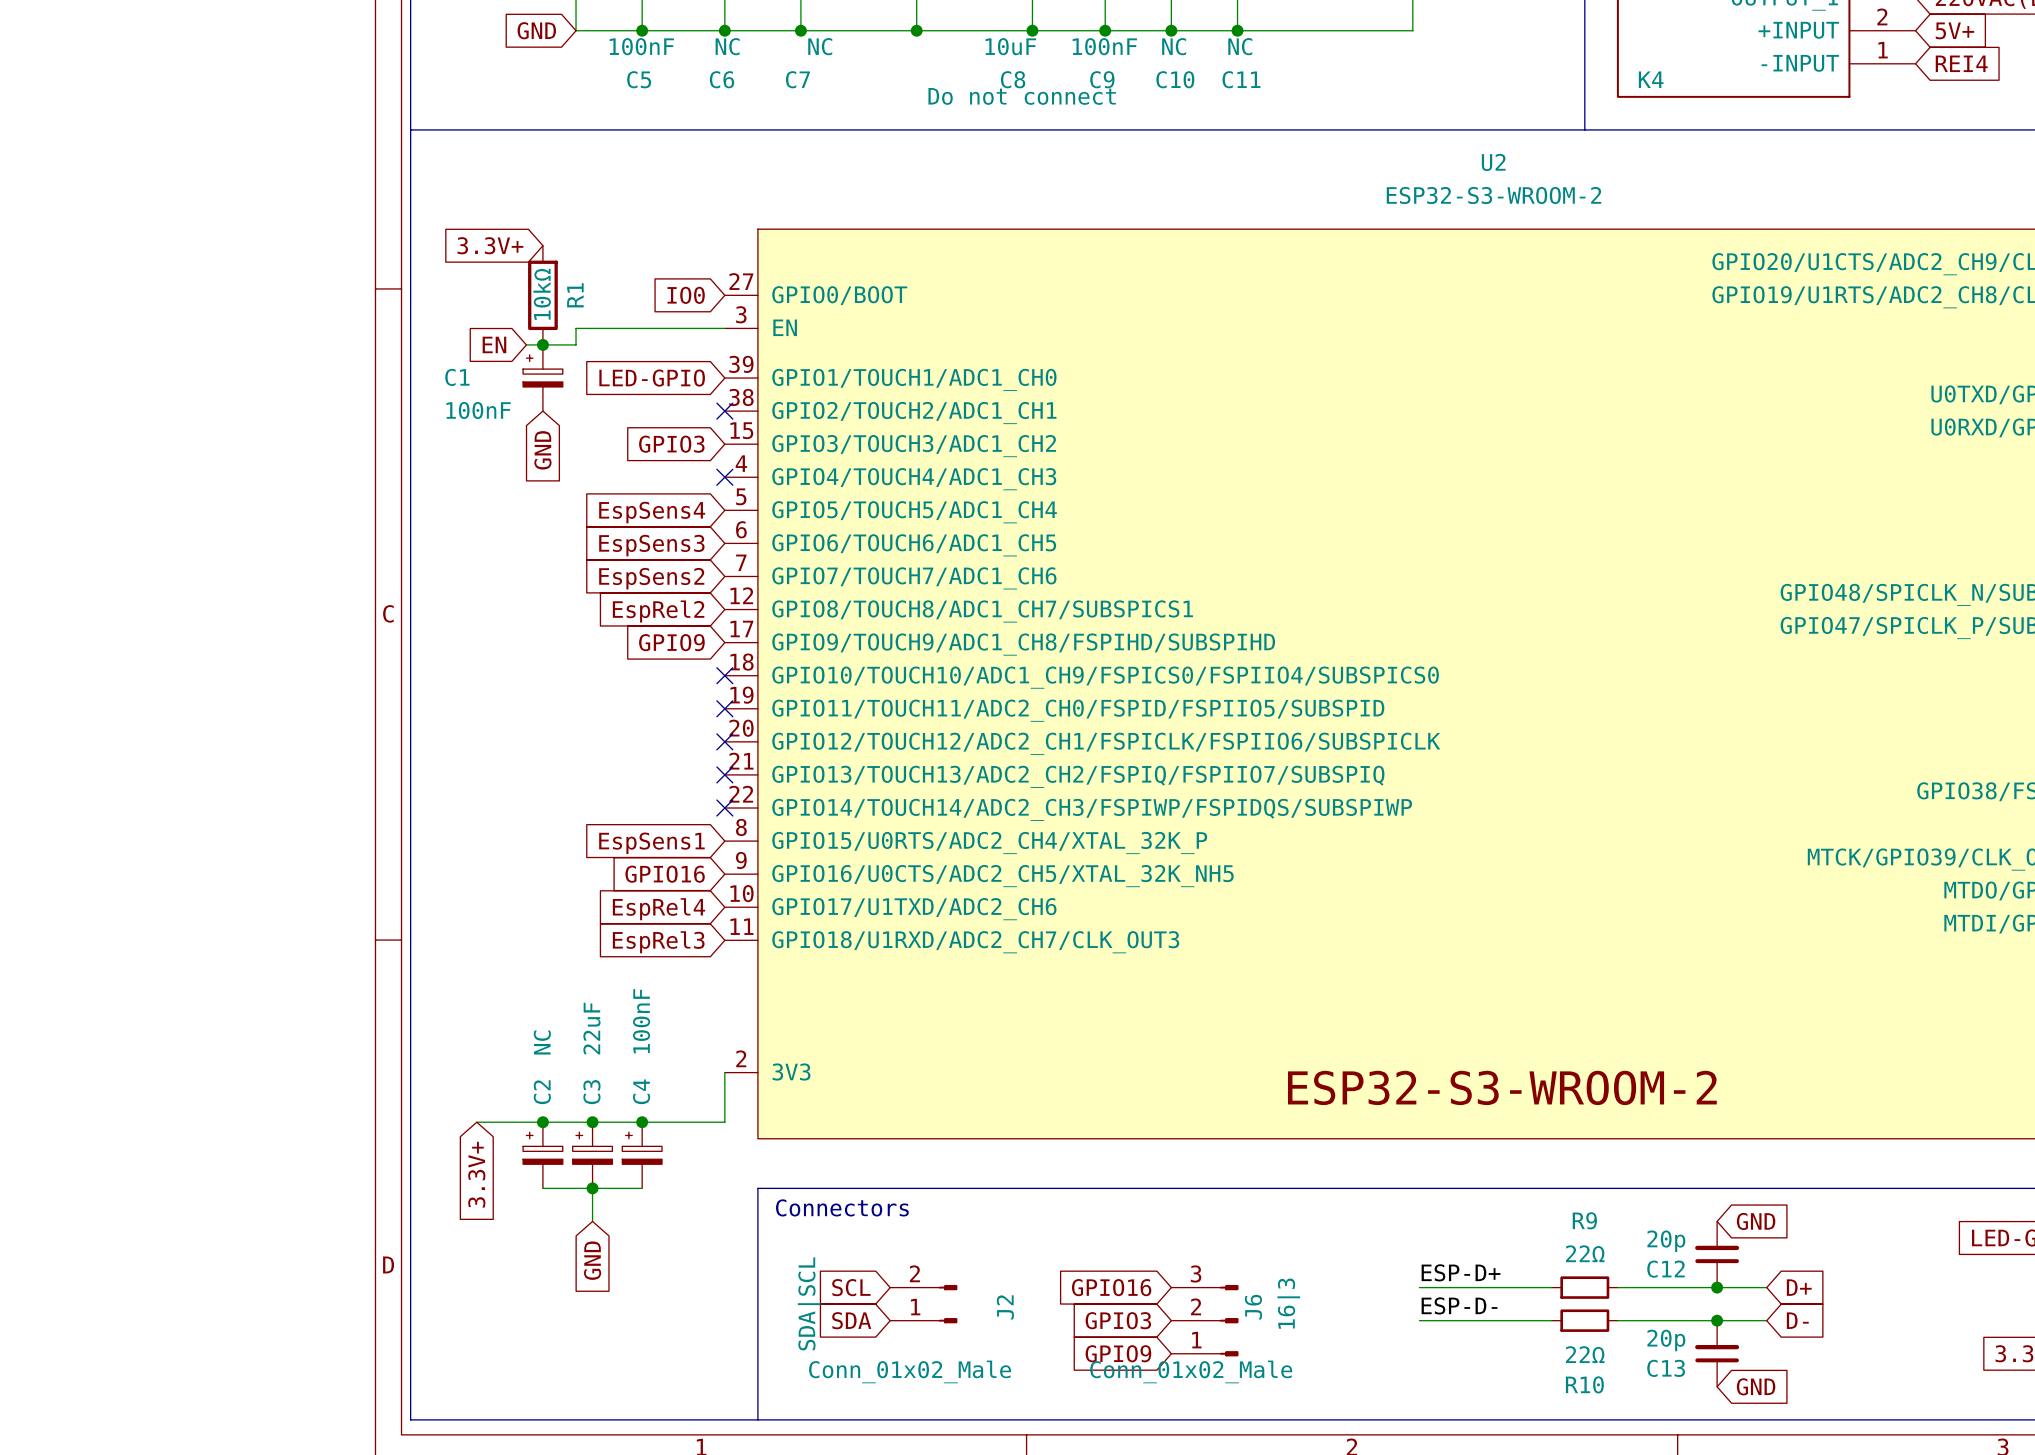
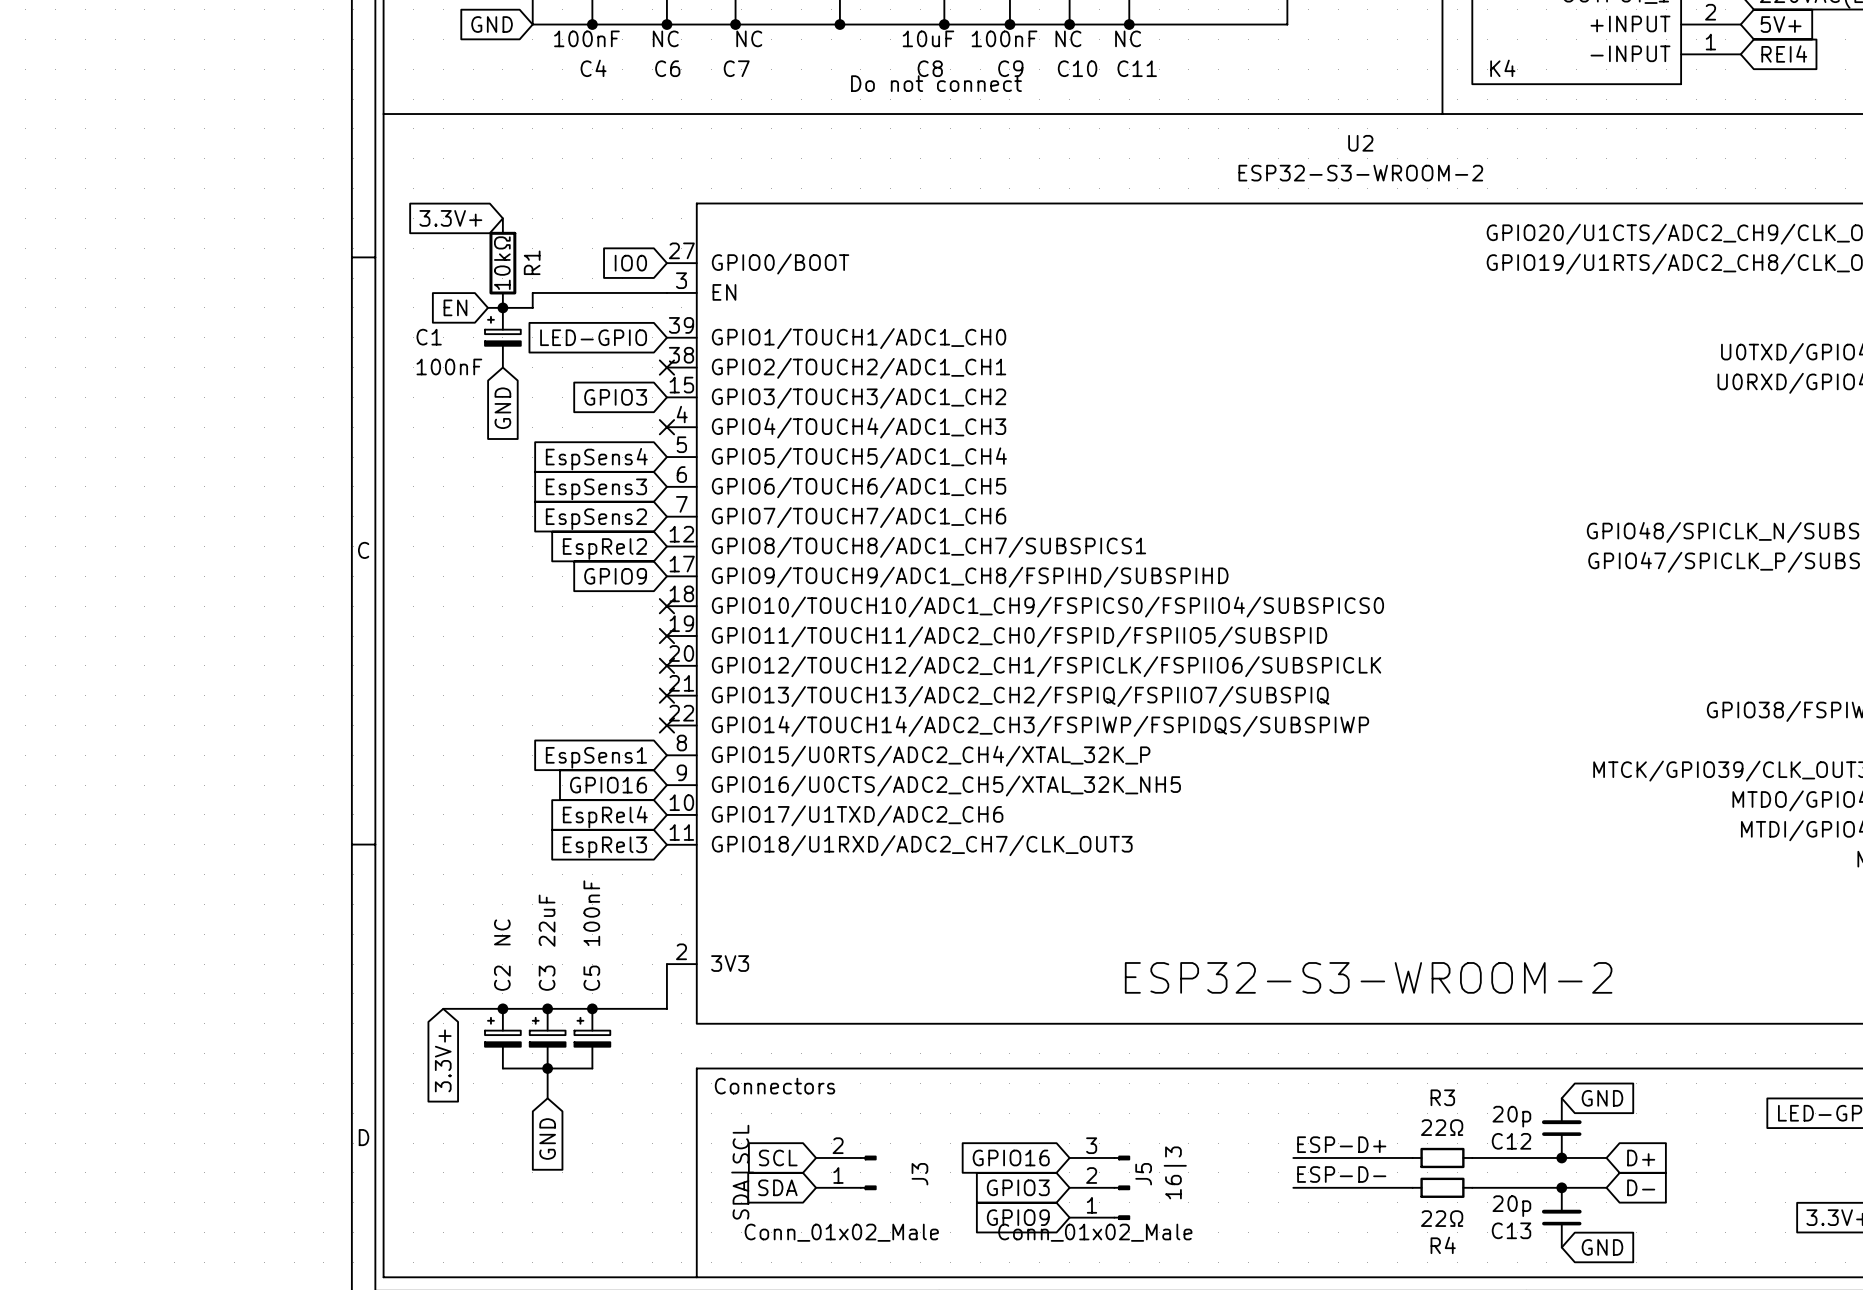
C5 name: C5 (639, 79) -> C4 (593, 68)
C4 name: C4 (641, 1091) -> C5 (591, 978)
R9 name: R9 (1584, 1220) -> R3 (1442, 1097)
J2 name: J2 (1005, 1307) -> J3 (919, 1174)
J6 name: J6 (1253, 1307) -> J5 (1143, 1174)
R10 name: R10 (1584, 1384) -> R4 (1443, 1245)

